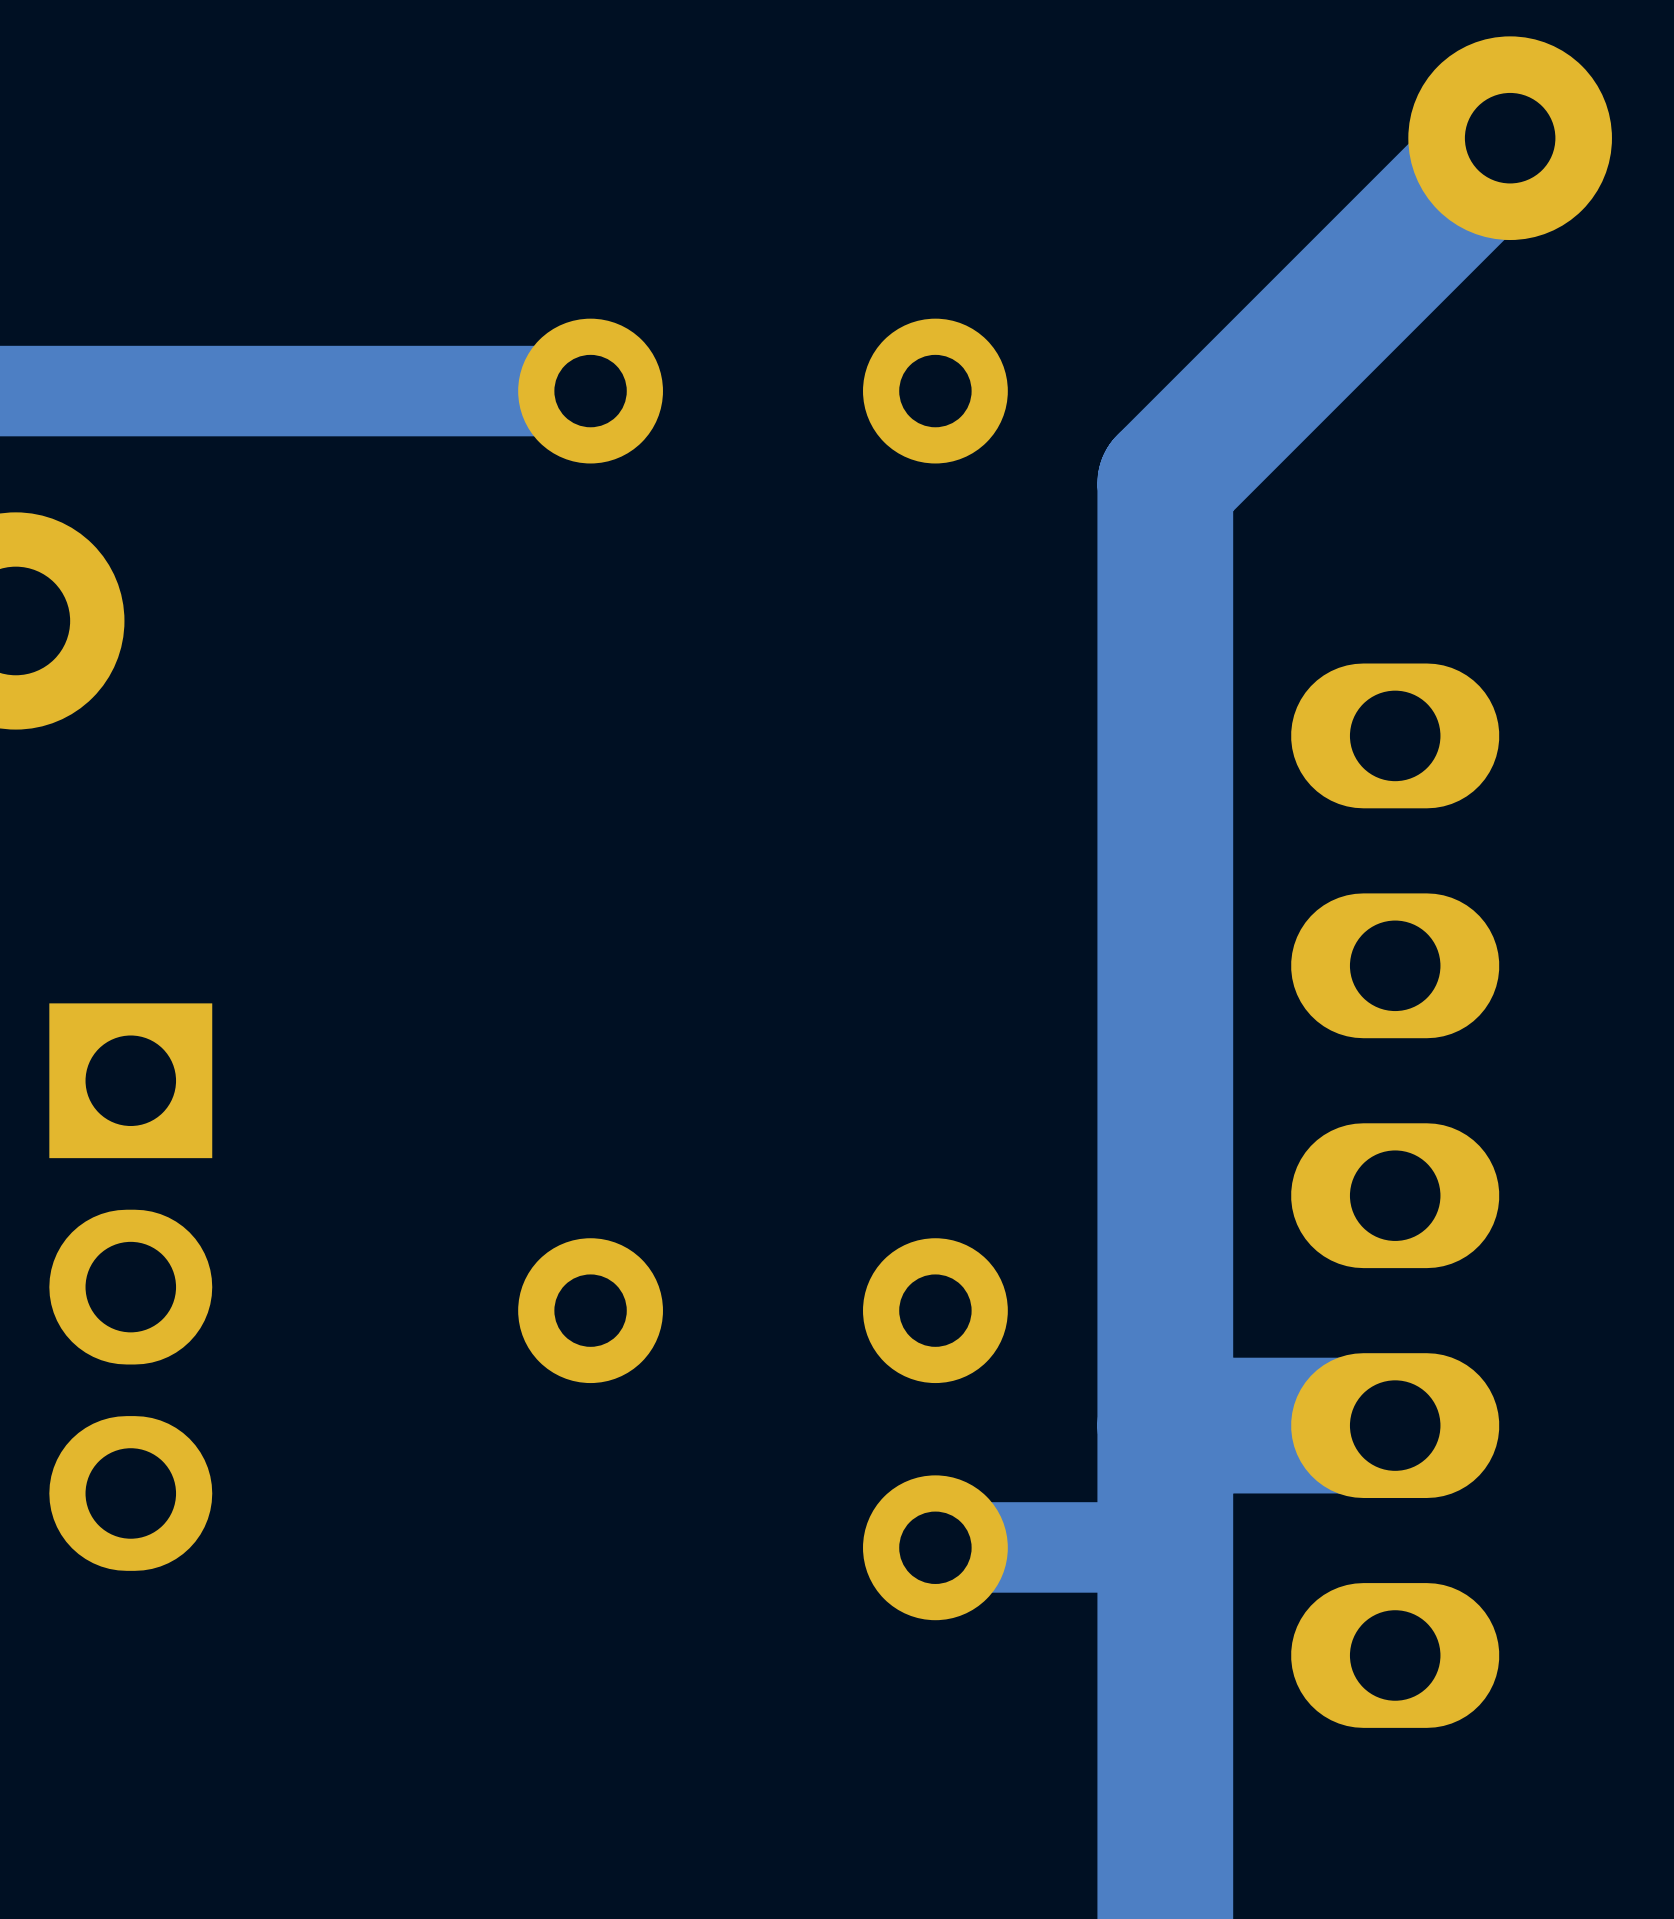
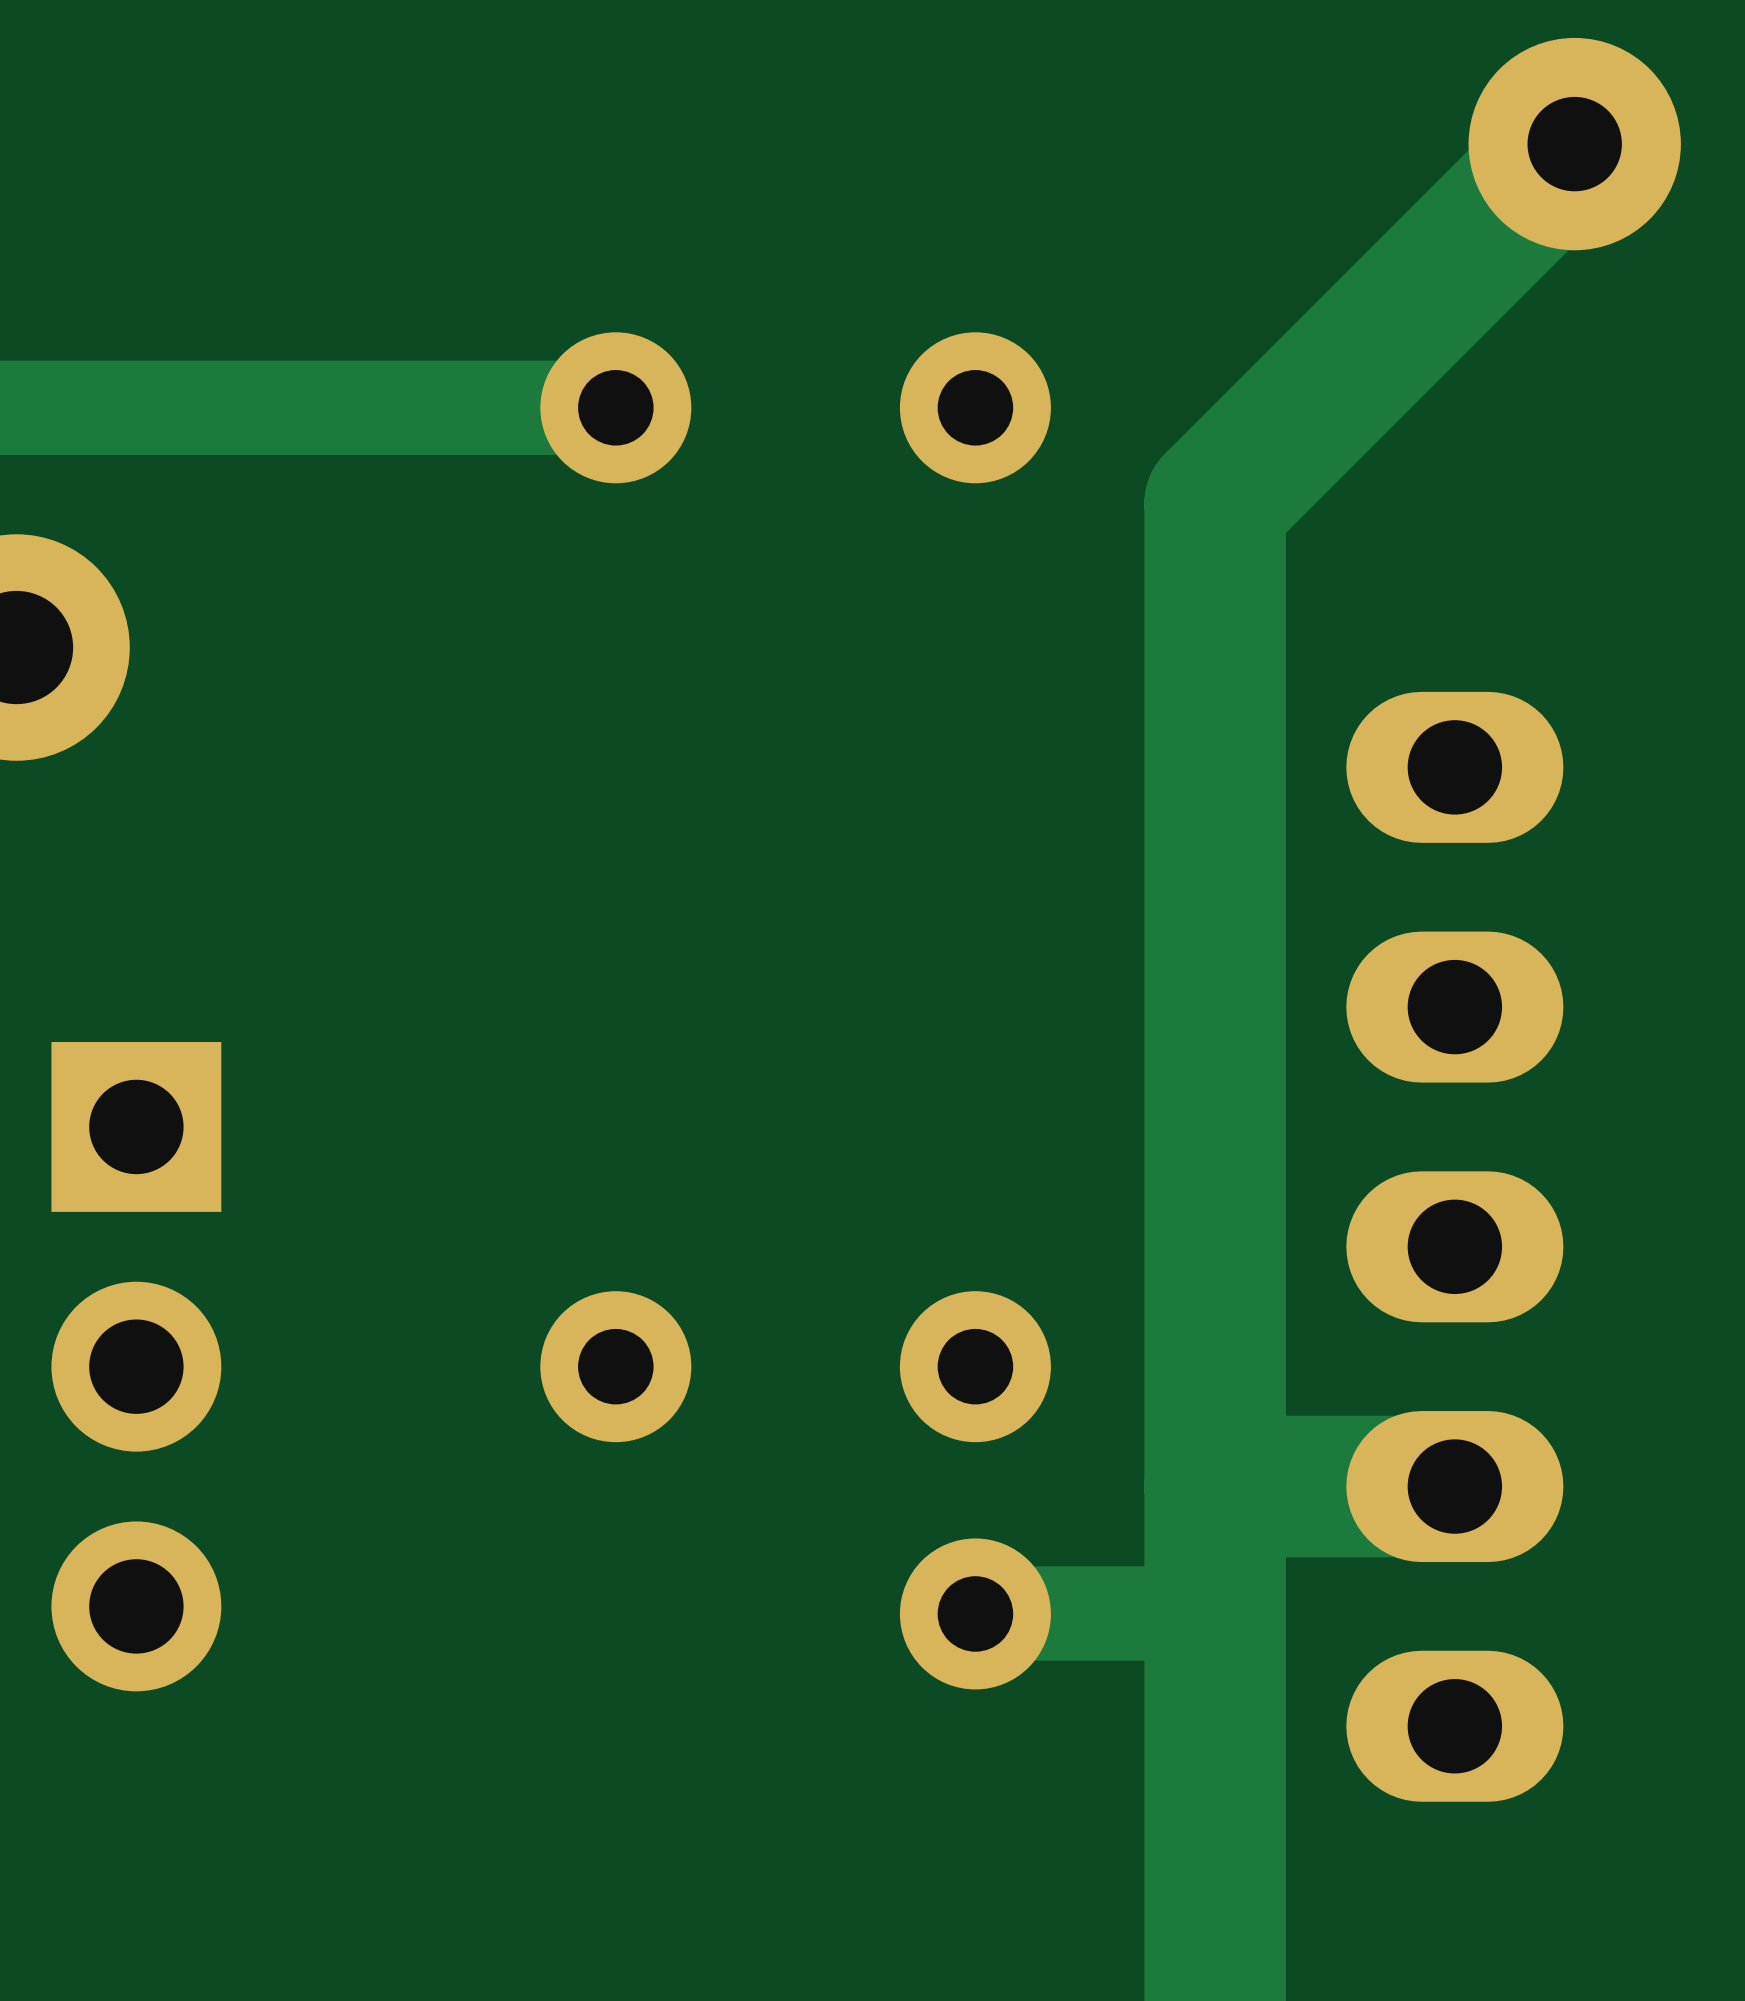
part footprint: [49, 1003, 213, 1571] -> [51, 1042, 222, 1692]

